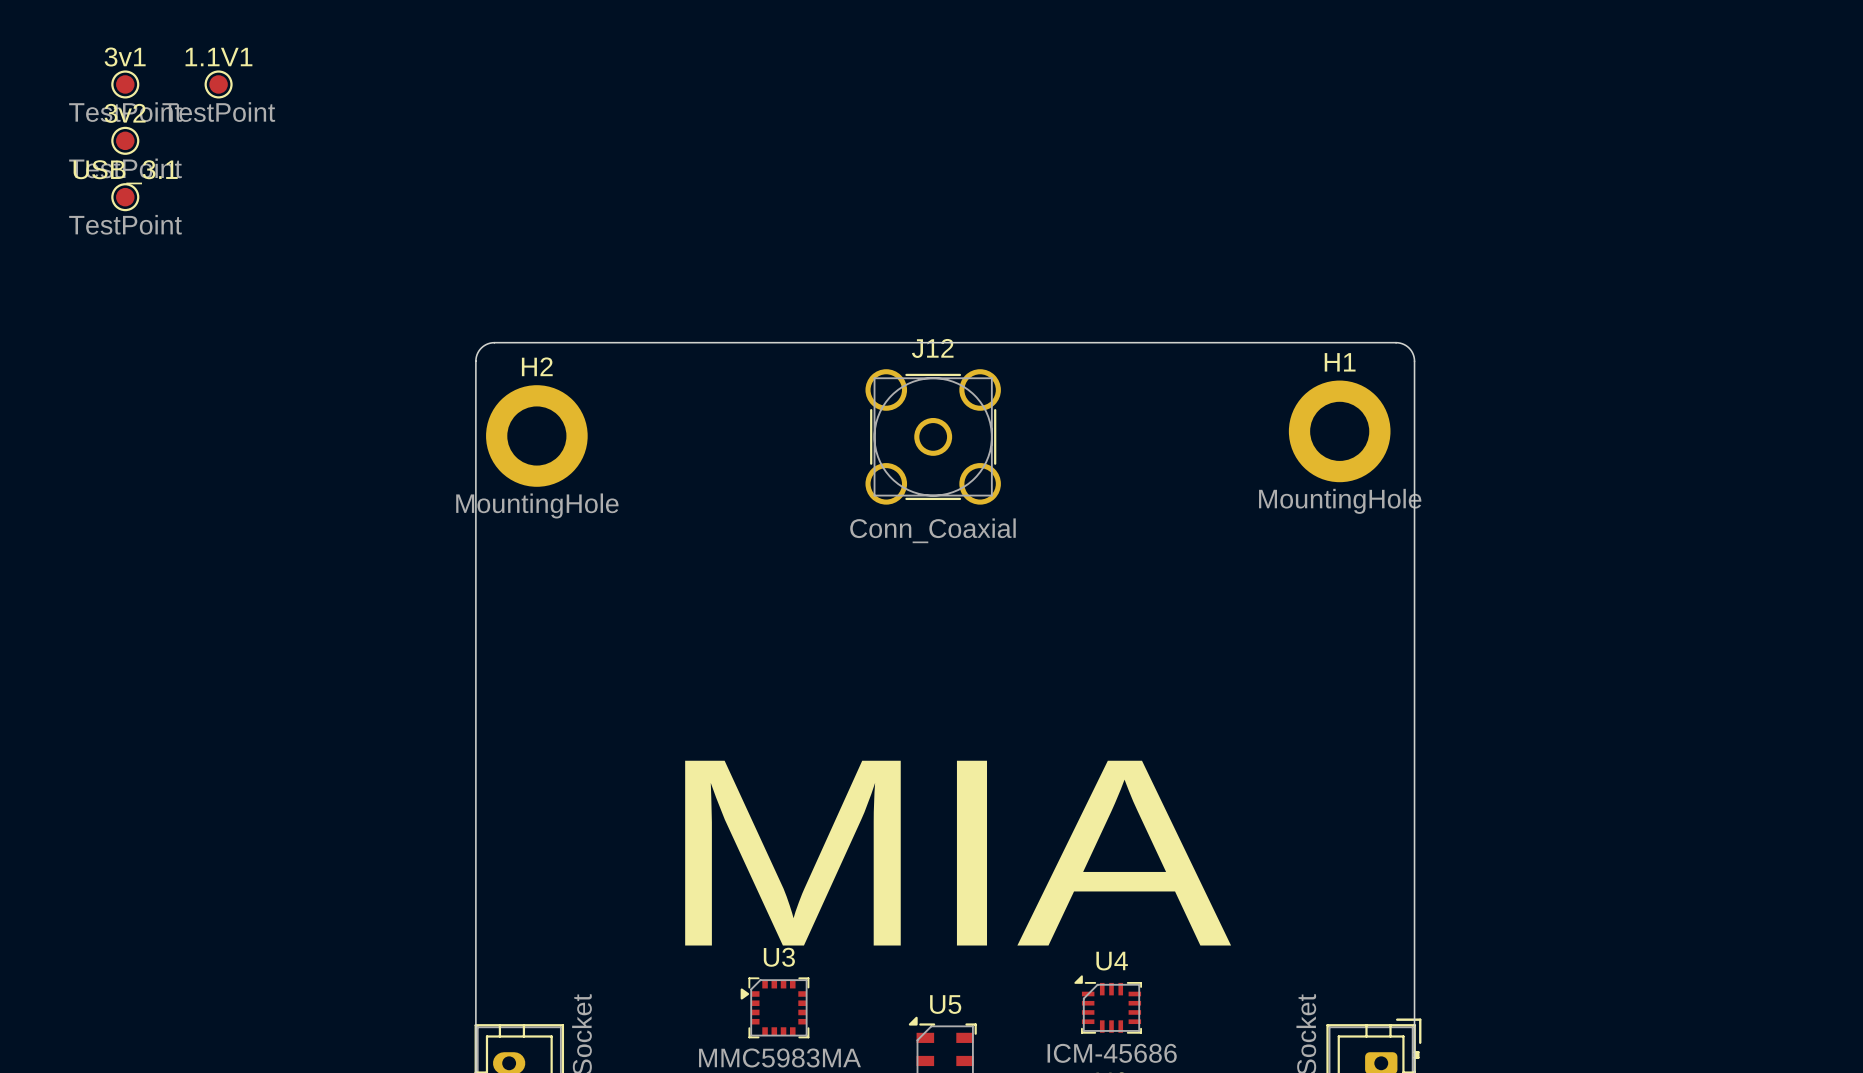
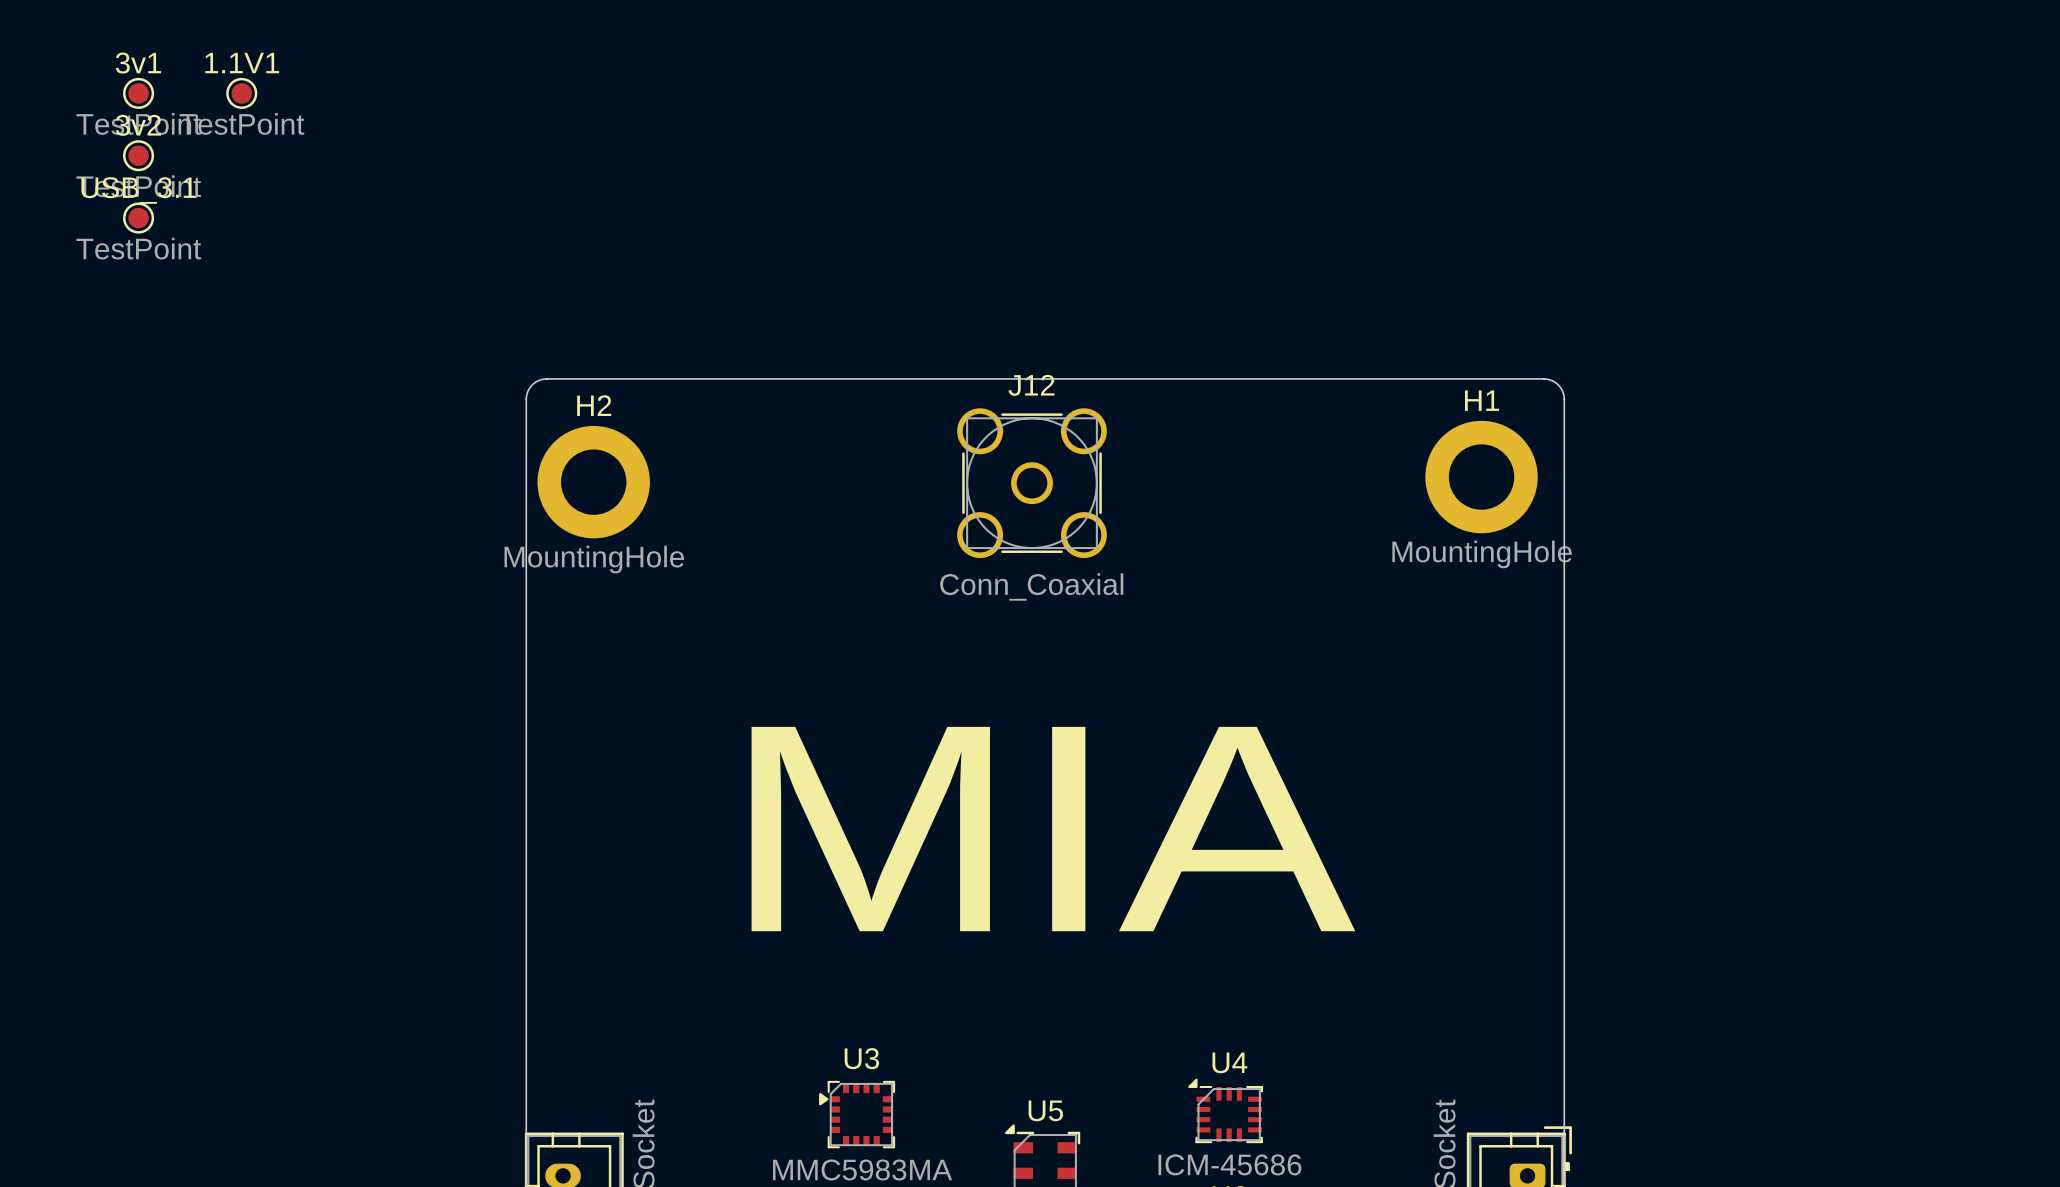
text position: MIA (958, 853) -> MIA (1053, 829)

